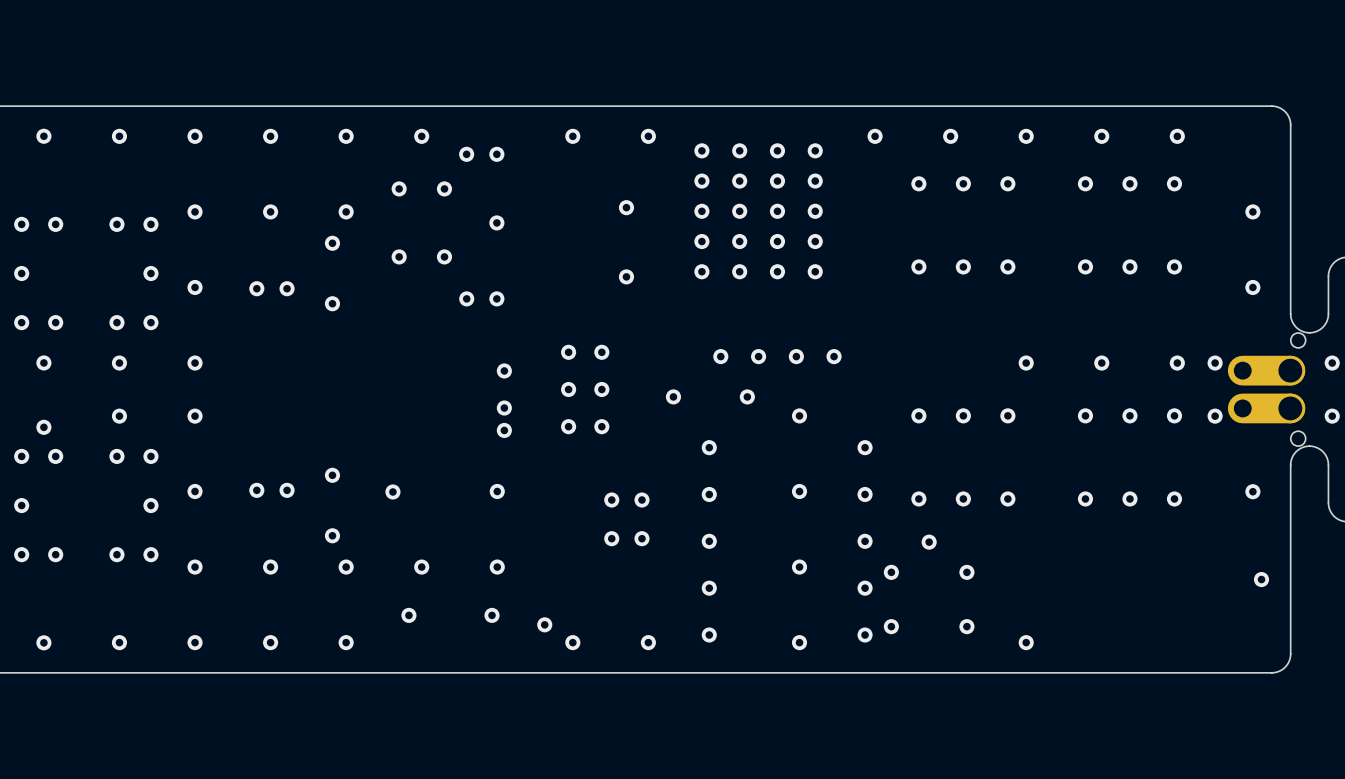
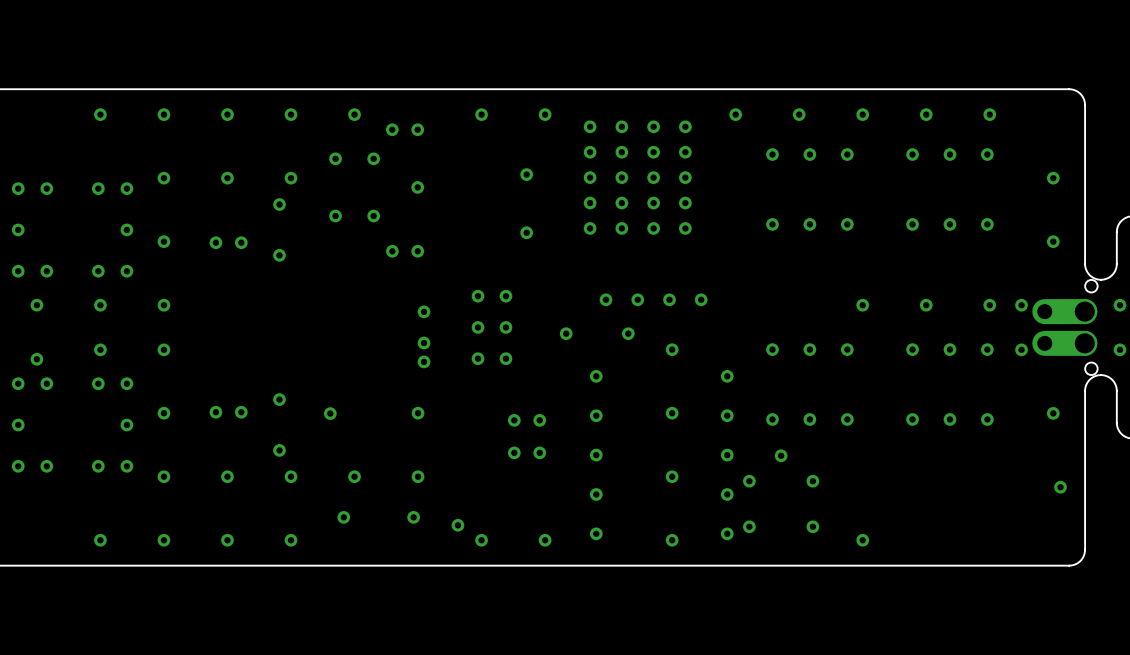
via: (43, 136) -> none
via: (43, 642) -> none

